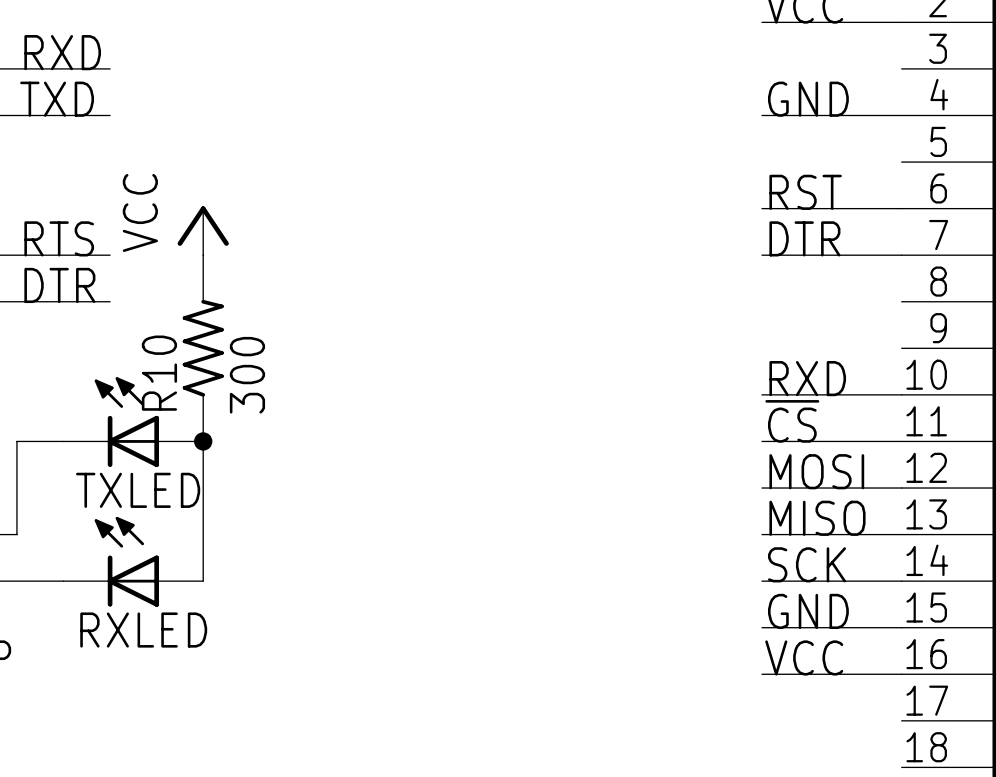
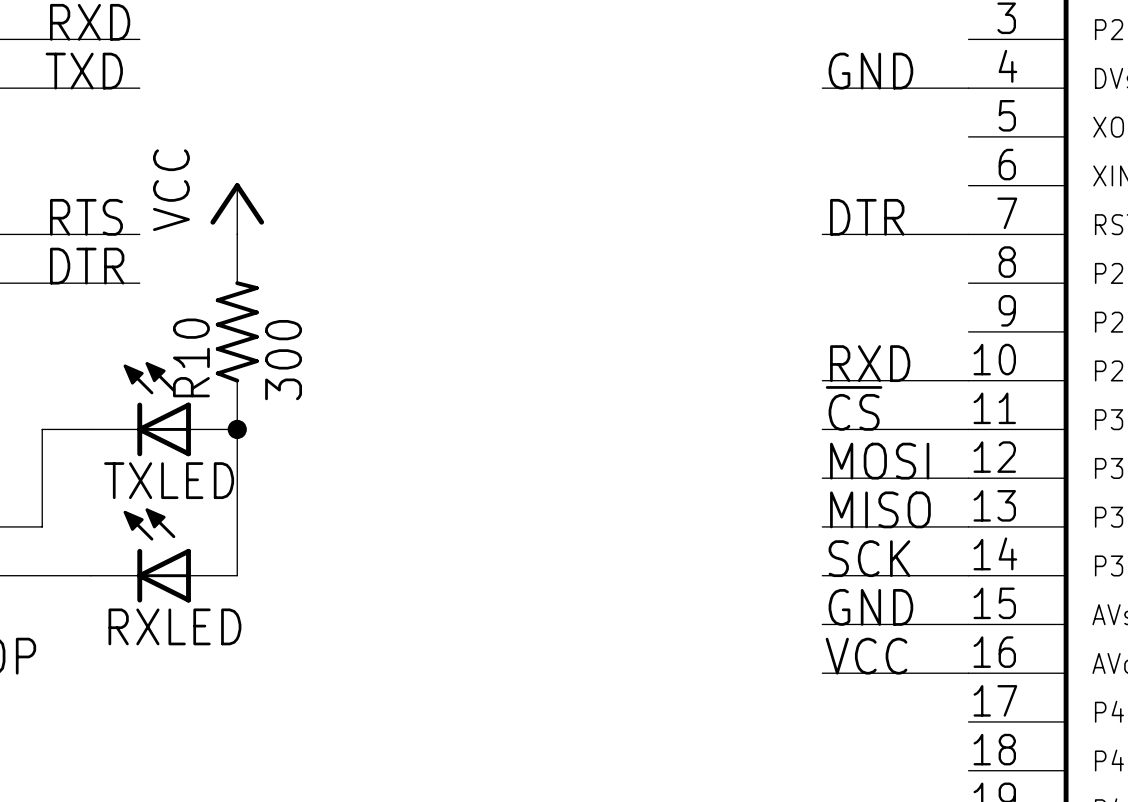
label: RST (805, 192) -> none
wire: (761, 208) (901, 208) -> none

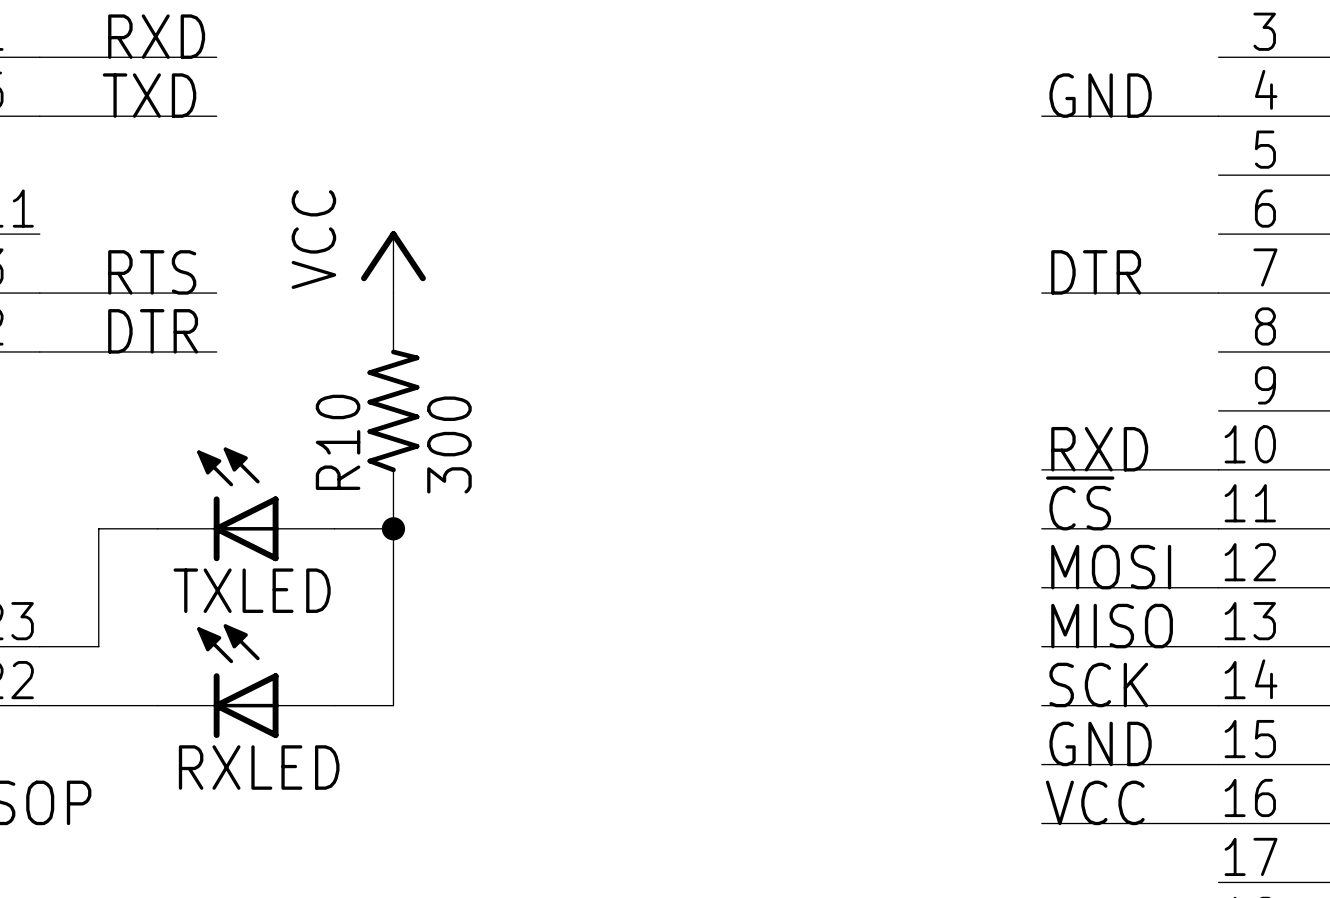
power symbol position: VCC (237, 208) -> VCC (393, 262)
R10 position: (237, 331) -> (393, 410)
wire: (237, 429) (237, 575) -> (334, 528) (393, 528) (393, 705) (334, 705)
junction position: (237, 429) -> (393, 528)

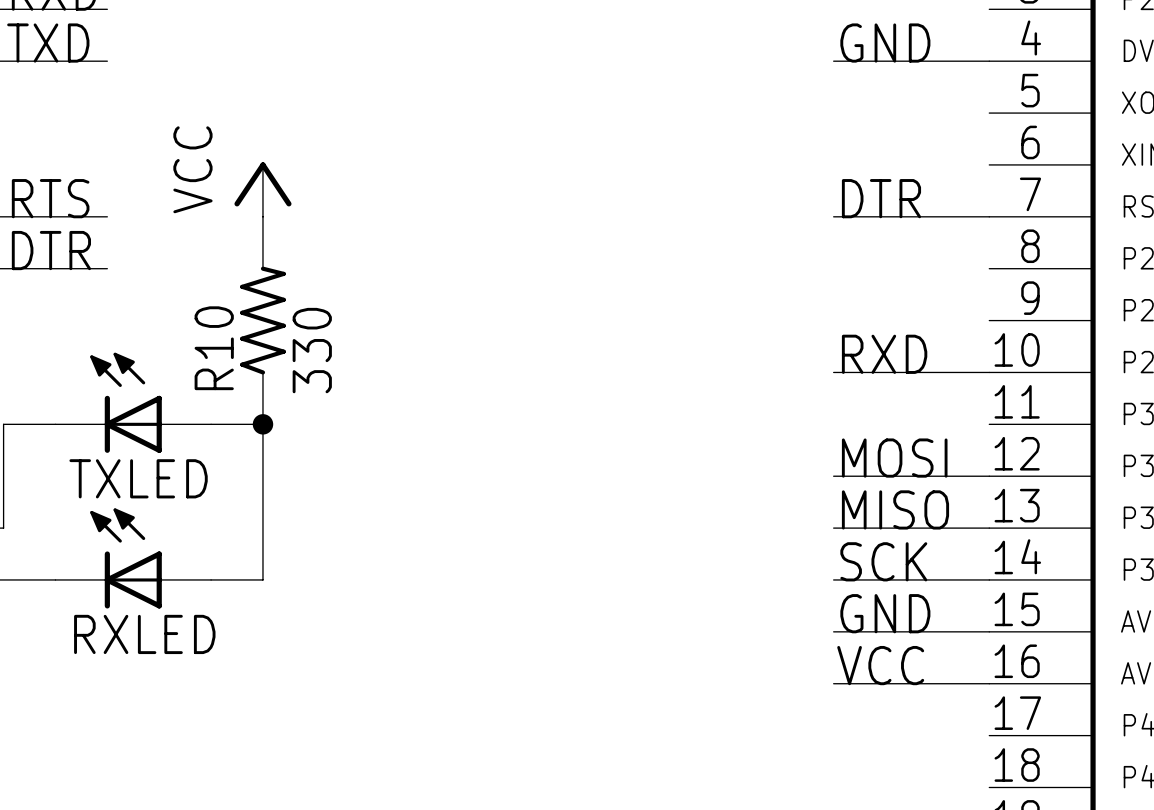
R10 value: 300 (449, 445) -> 330 (312, 350)
label: ~{CS} (1080, 503) -> none
wire: (1041, 528) (1218, 528) -> none

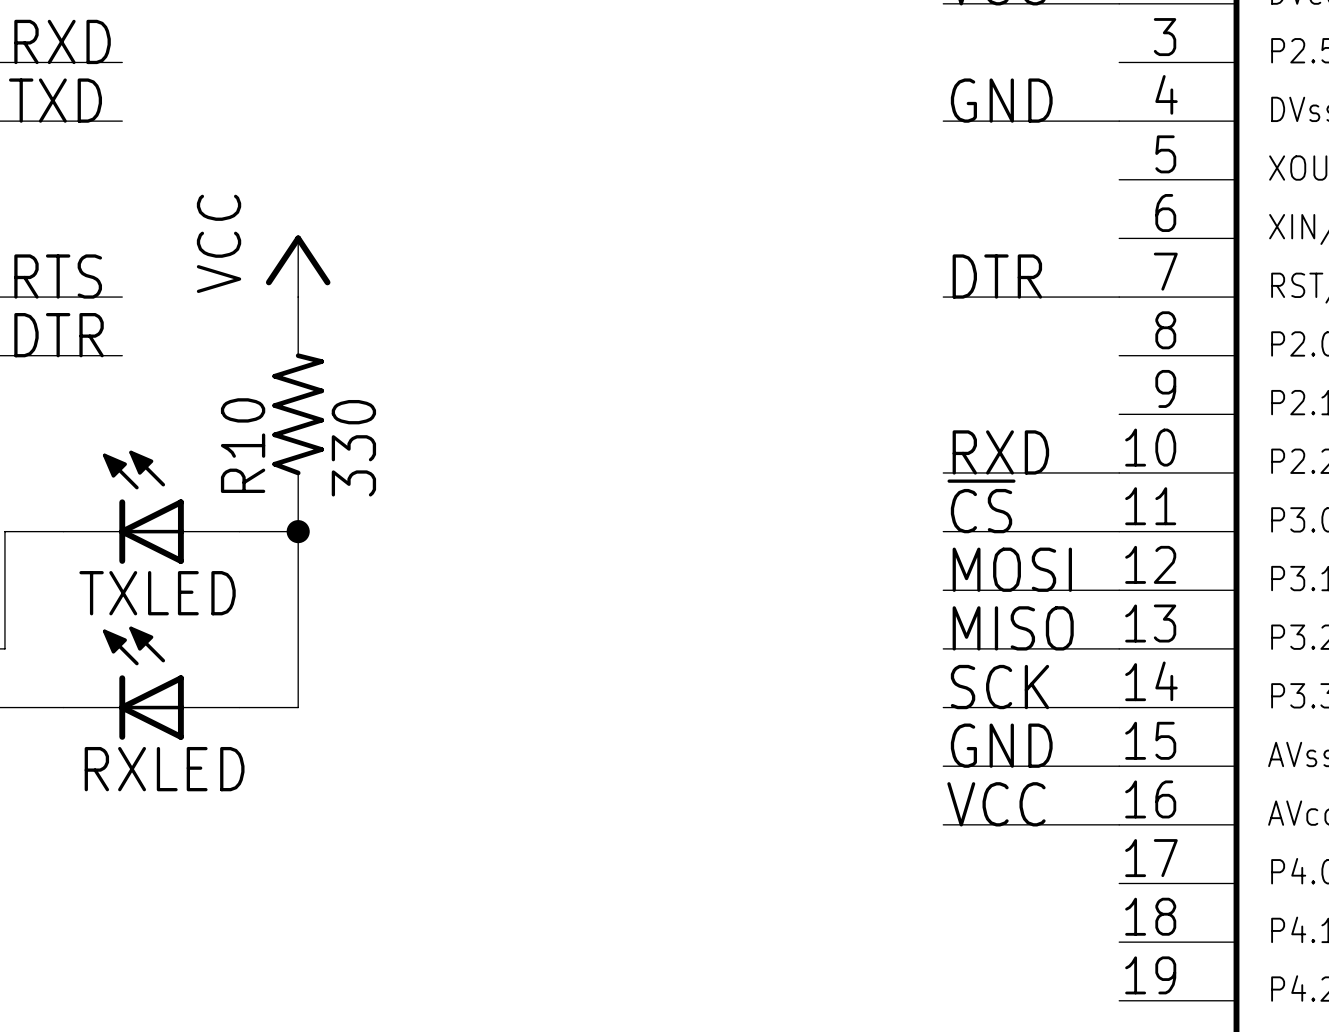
label: none -> ~{CS} (981, 506)
wire: none -> (943, 531) (1119, 531)

